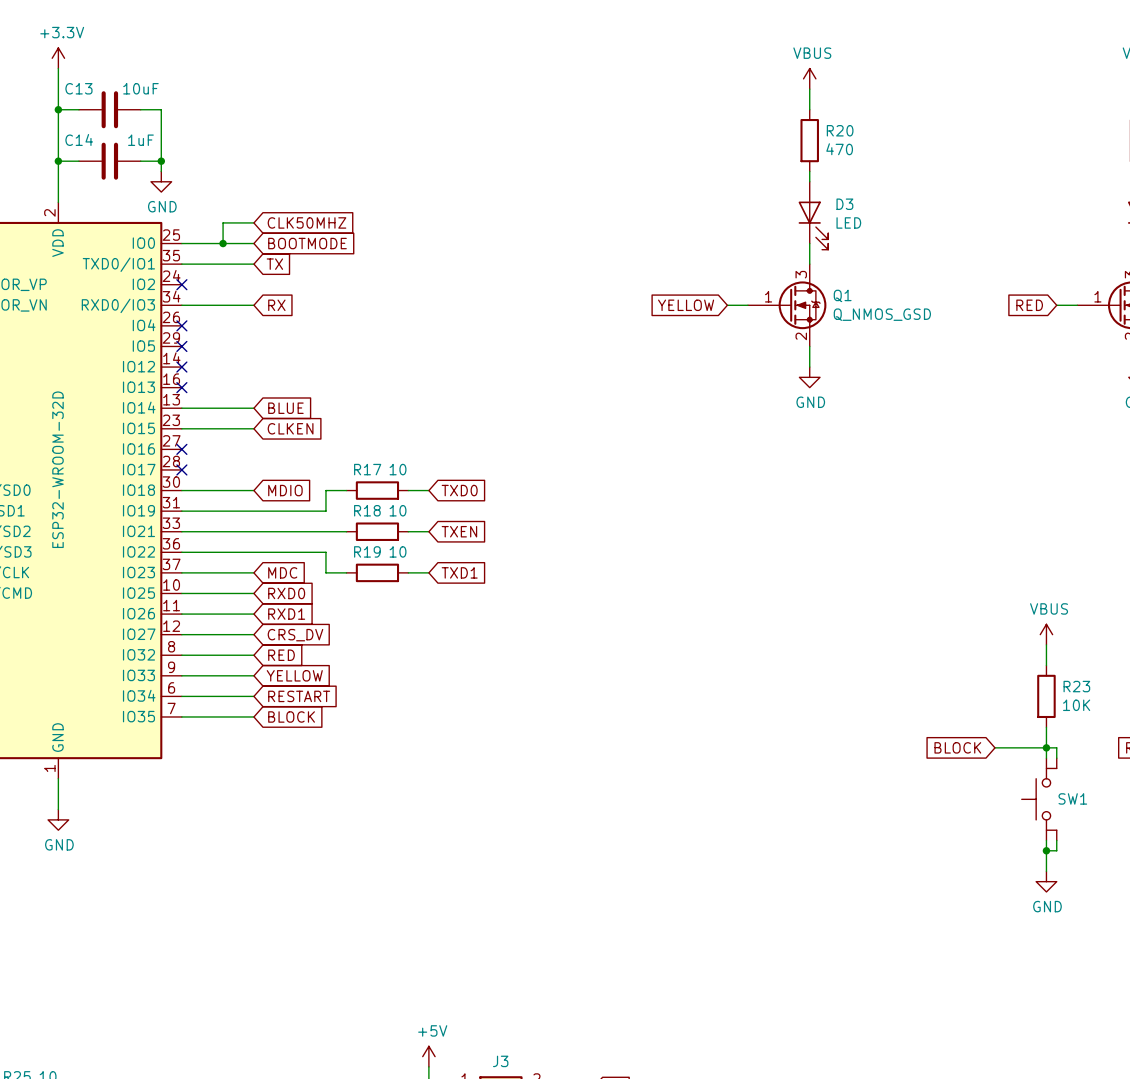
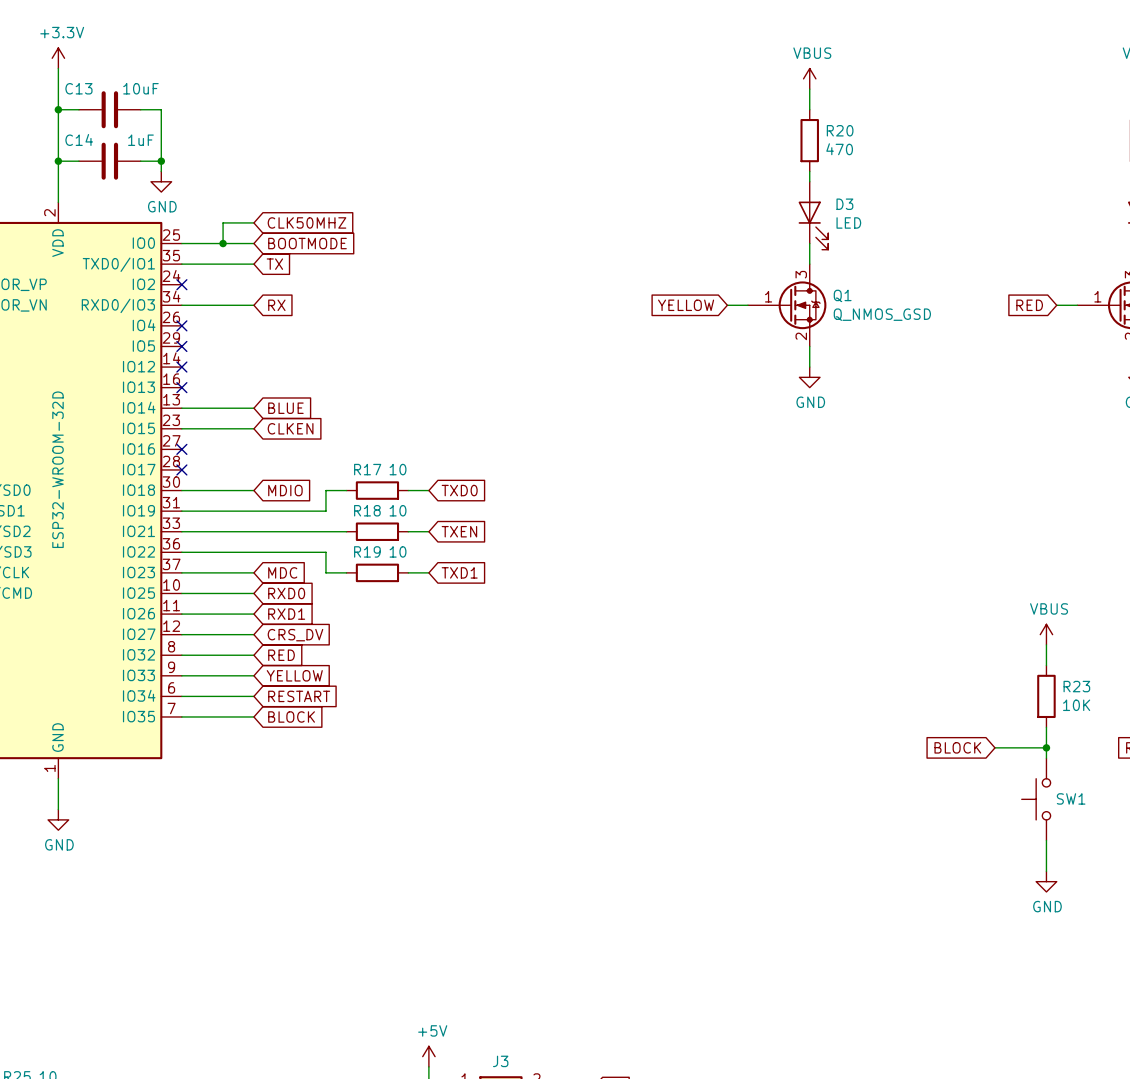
wire: (1046, 747) (1056, 747) (1056, 758) -> none
SW1 symbol: [1021, 758, 1057, 841] -> [1021, 758, 1051, 841]
wire: (1056, 840) (1056, 850) (1046, 850) -> none
junction: (1046, 850) -> none

